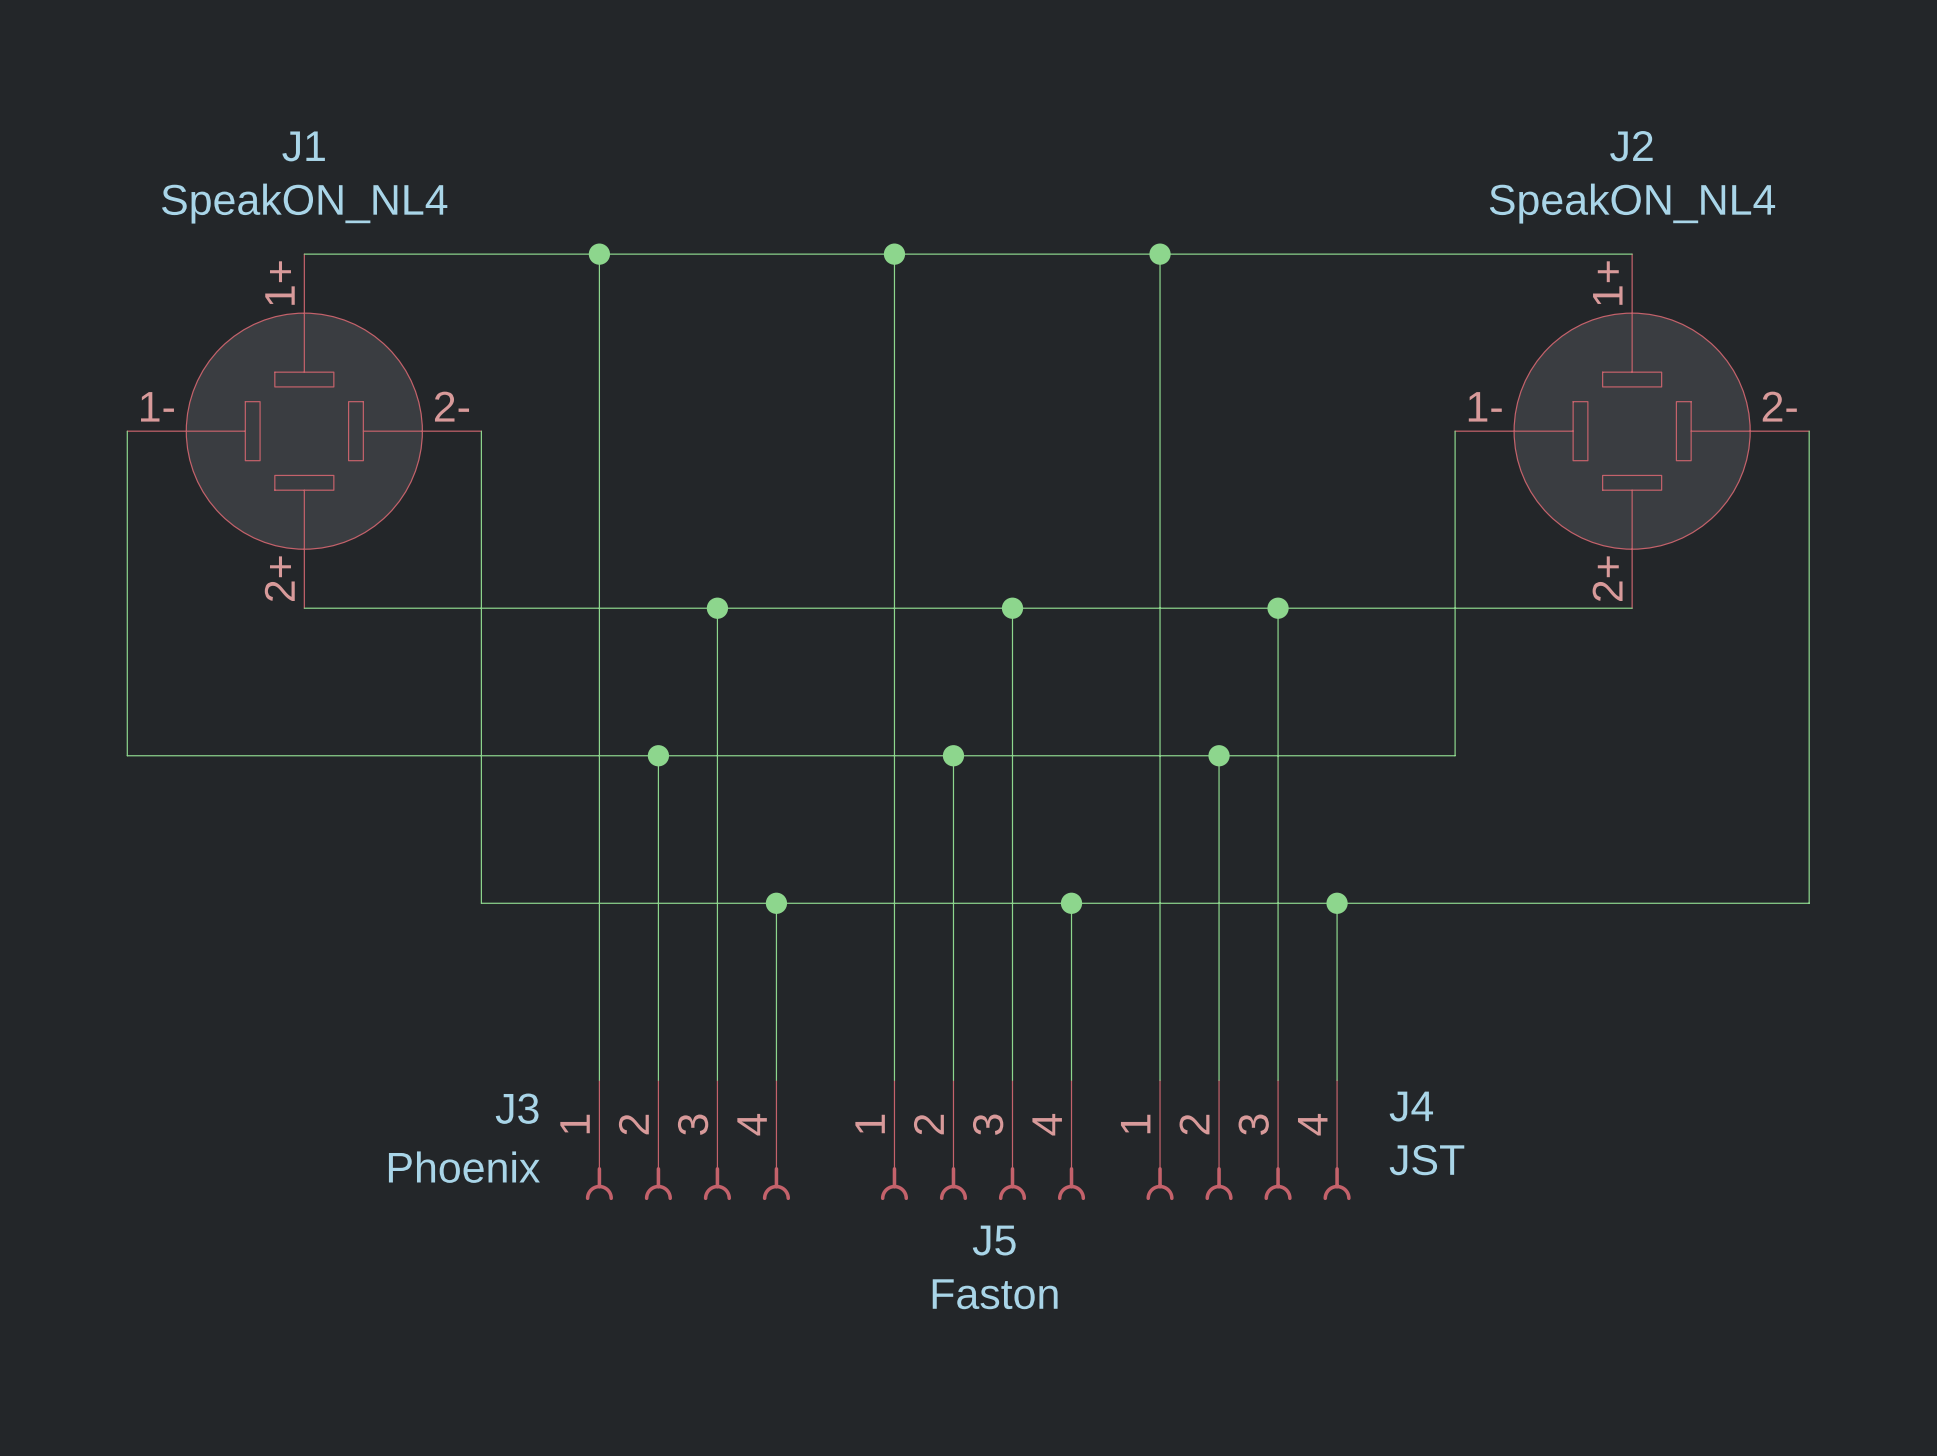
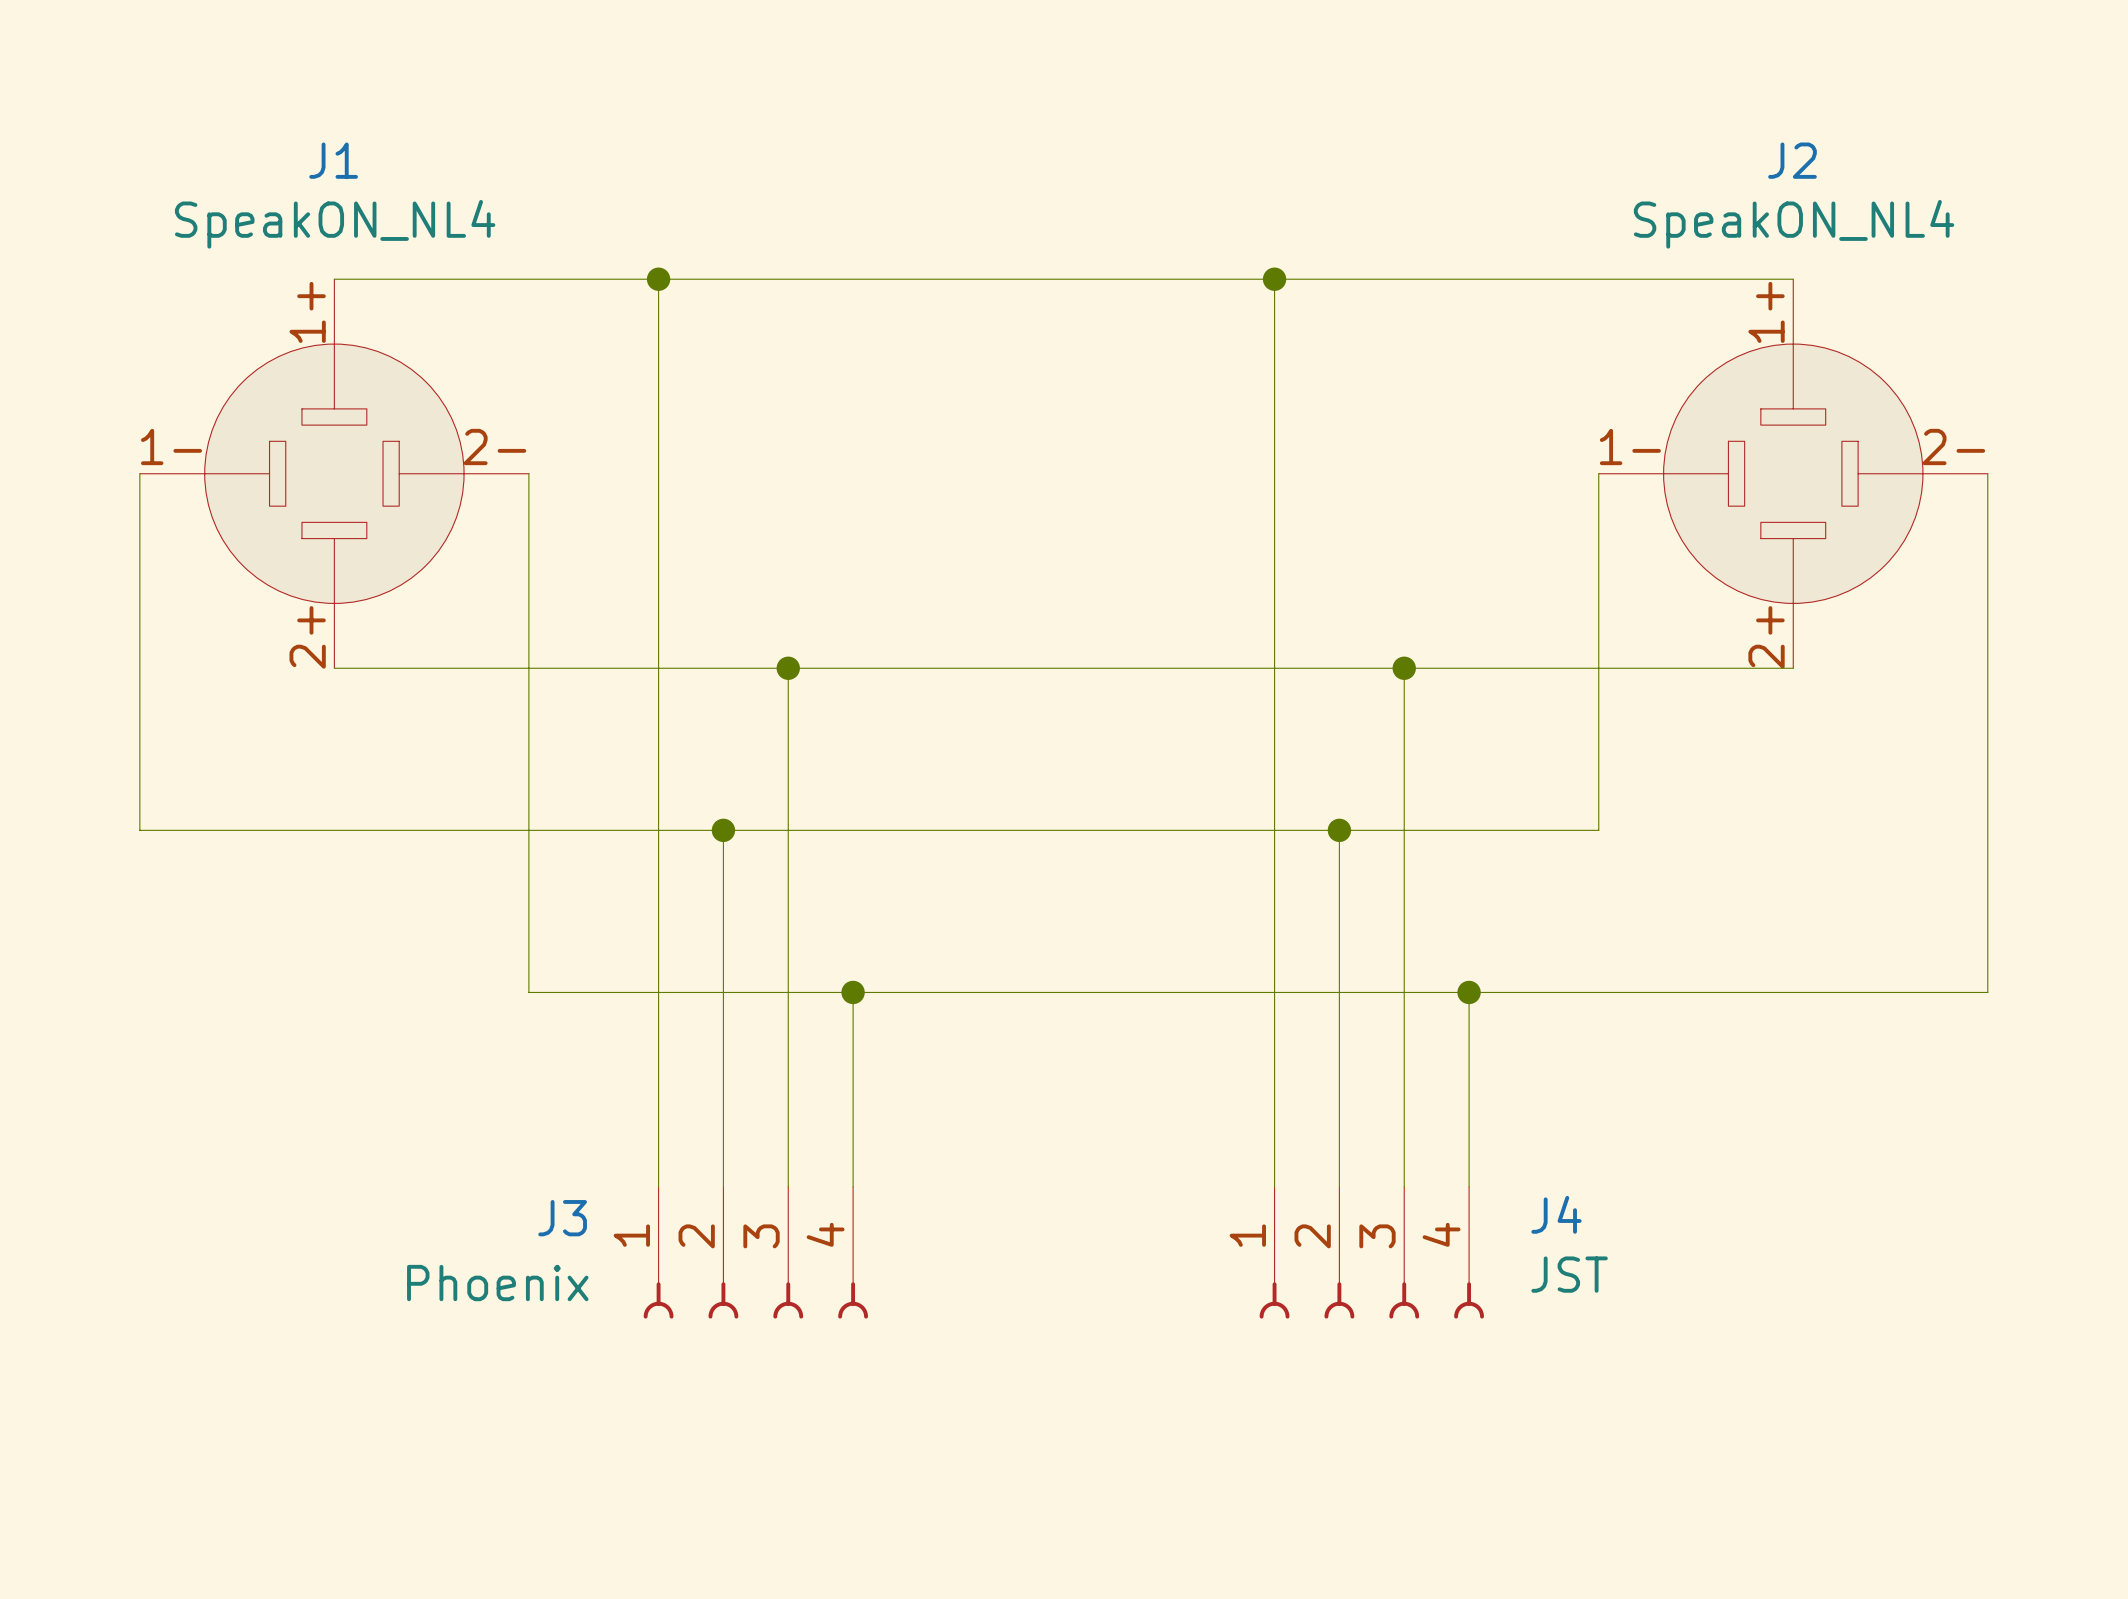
wire: (894, 254) (894, 1080) -> none
junction: (894, 254) -> none
wire: (1012, 608) (1012, 1080) -> none
junction: (1012, 608) -> none
wire: (953, 755) (953, 1080) -> none
junction: (953, 755) -> none
wire: (1071, 903) (1071, 1080) -> none
junction: (1071, 903) -> none
J5: Faston (982, 1140) -> none

